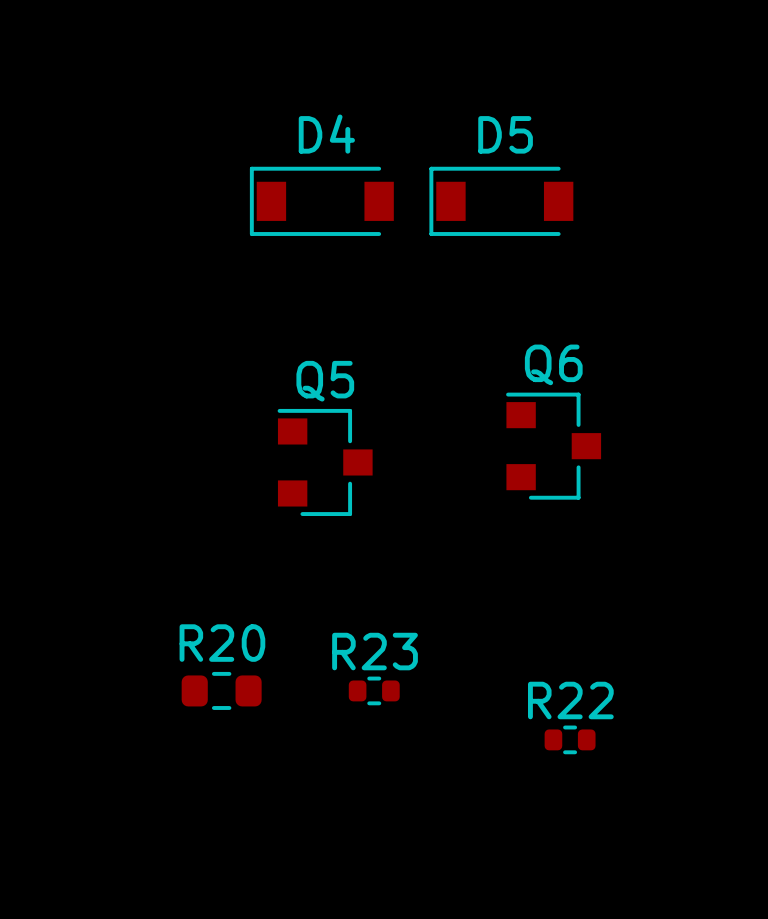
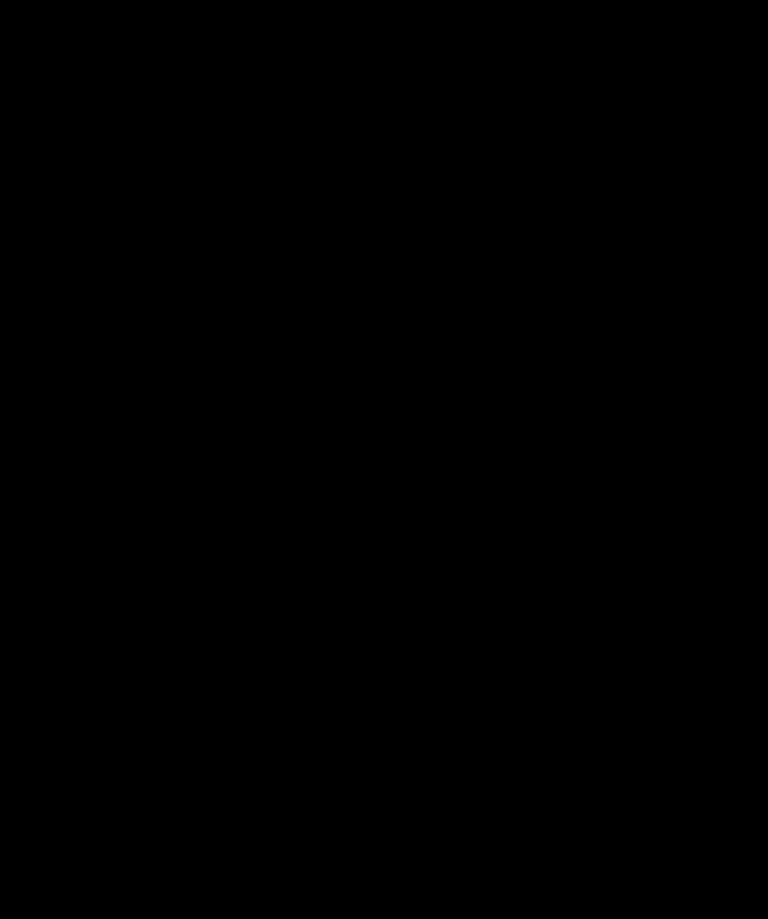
D4: (321, 201) -> none
D5: (501, 201) -> none
Q6: (553, 446) -> none
Q5: (325, 462) -> none
R20: (221, 690) -> none
R23: (374, 690) -> none
R22: (570, 739) -> none

